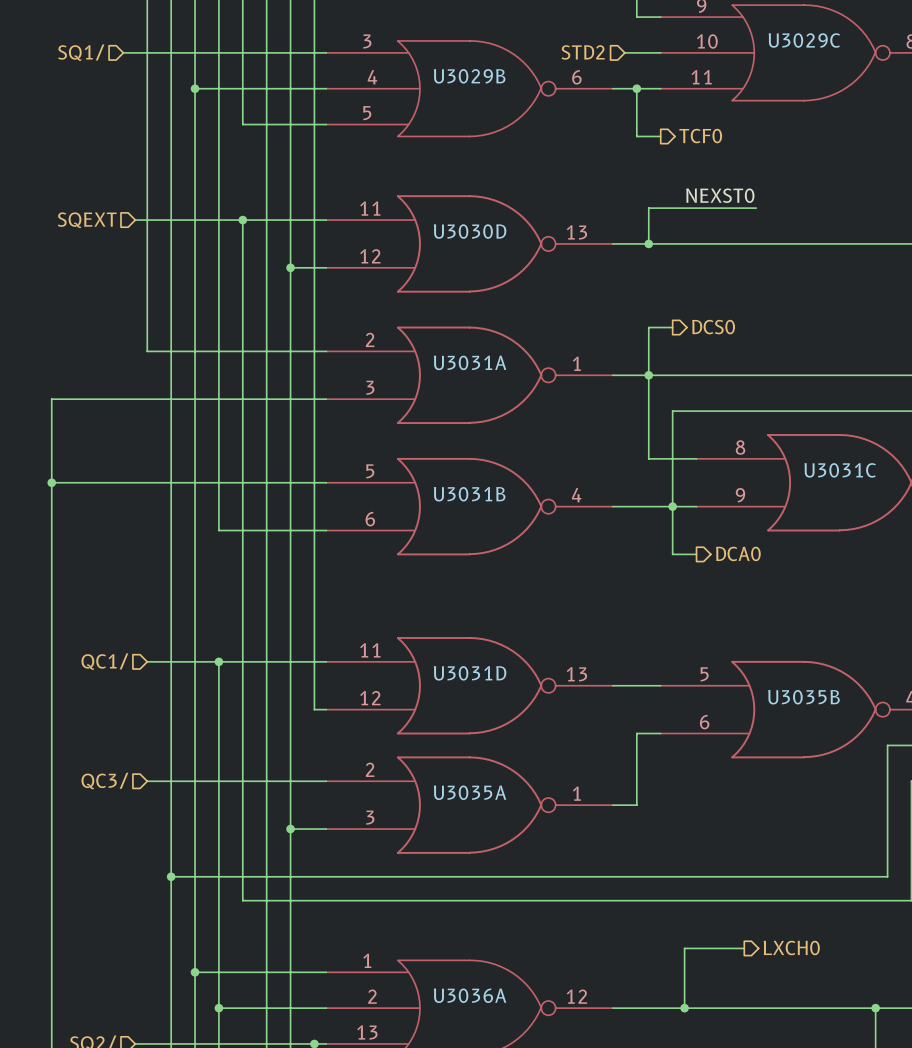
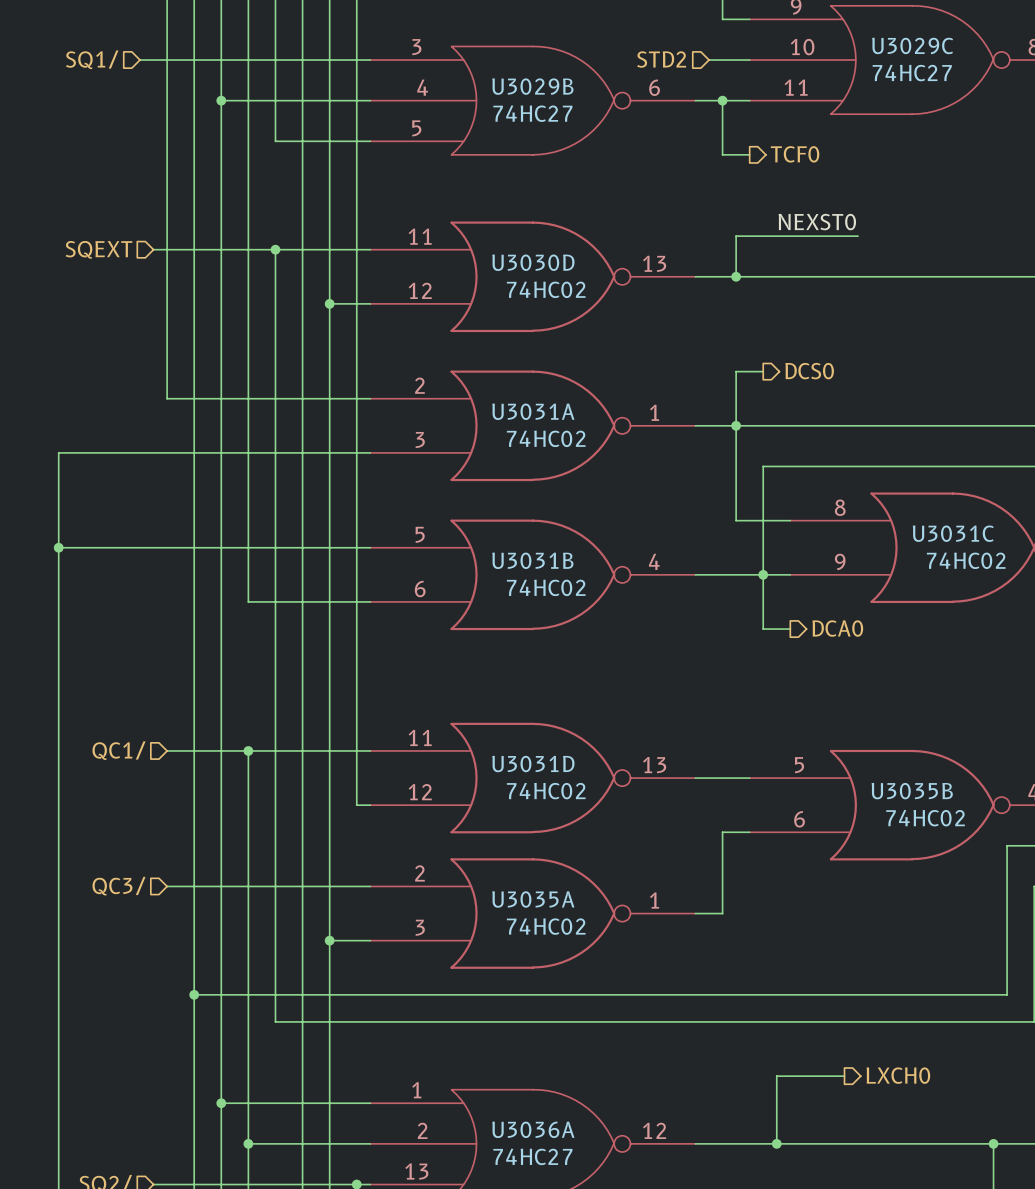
U3029C value: none -> 74HC27 (912, 73)
U3029B value: none -> 74HC27 (532, 113)
U3030D value: none -> 74HC02 (546, 289)
U3031A value: none -> 74HC02 (546, 438)
U3031C value: none -> 74HC02 (966, 560)
U3031B value: none -> 74HC02 (546, 587)
U3031D value: none -> 74HC02 (546, 791)
U3035B value: none -> 74HC02 (925, 818)
U3035A value: none -> 74HC02 (546, 926)
U3036A value: none -> 74HC27 (532, 1156)

